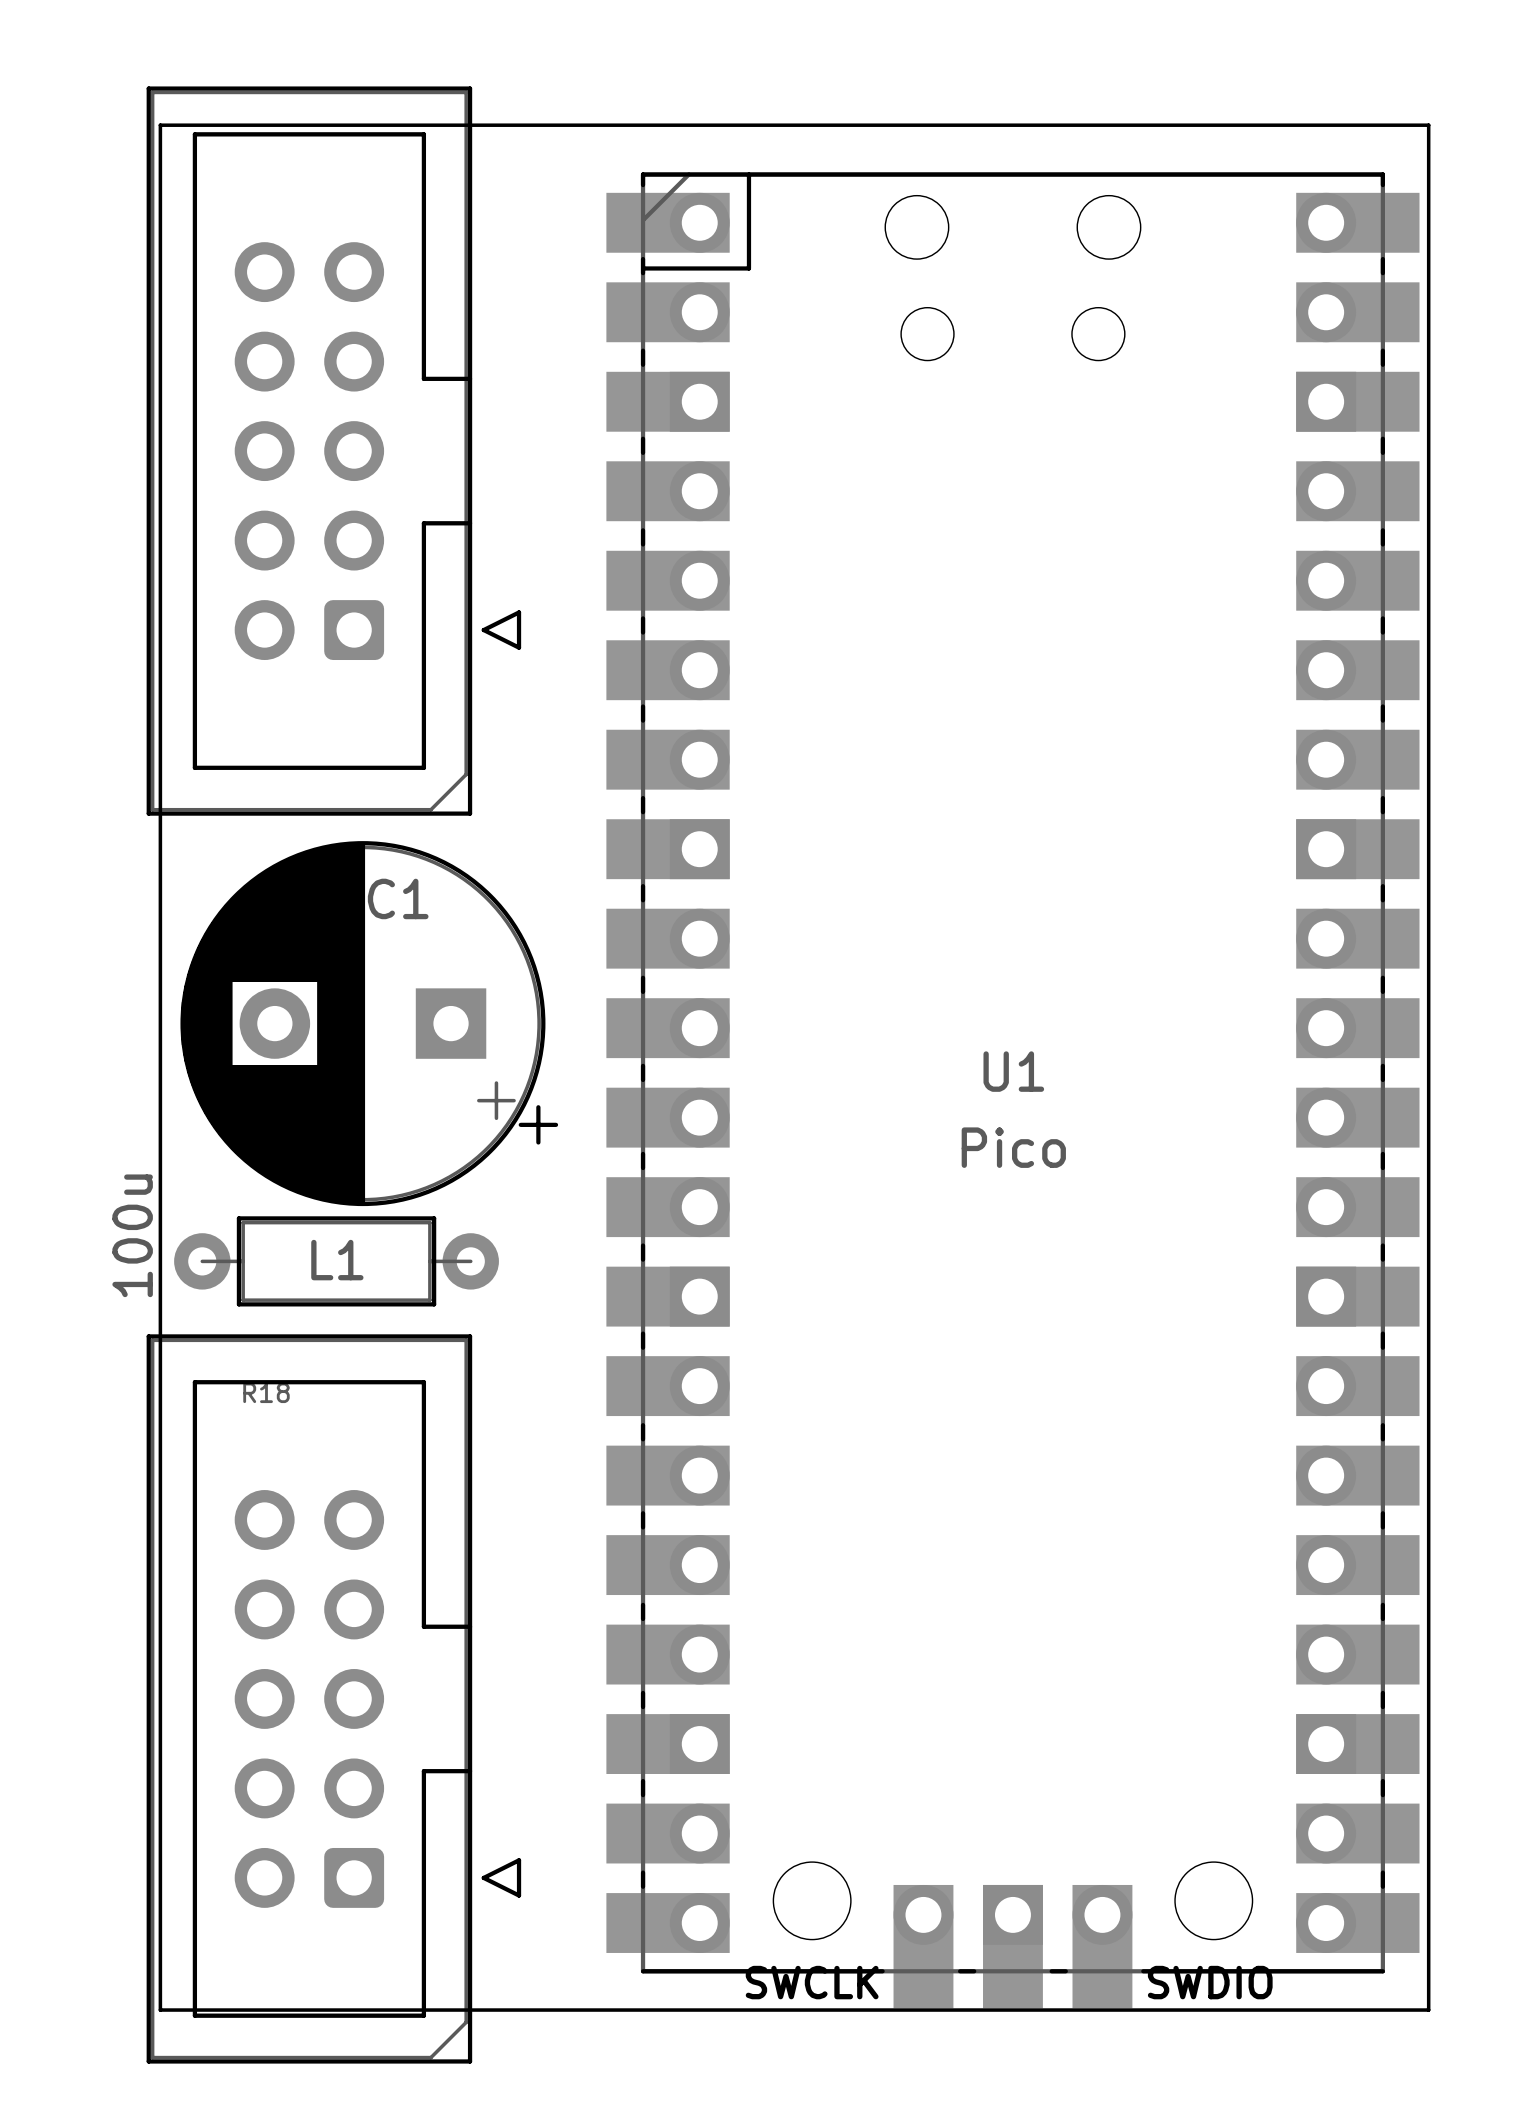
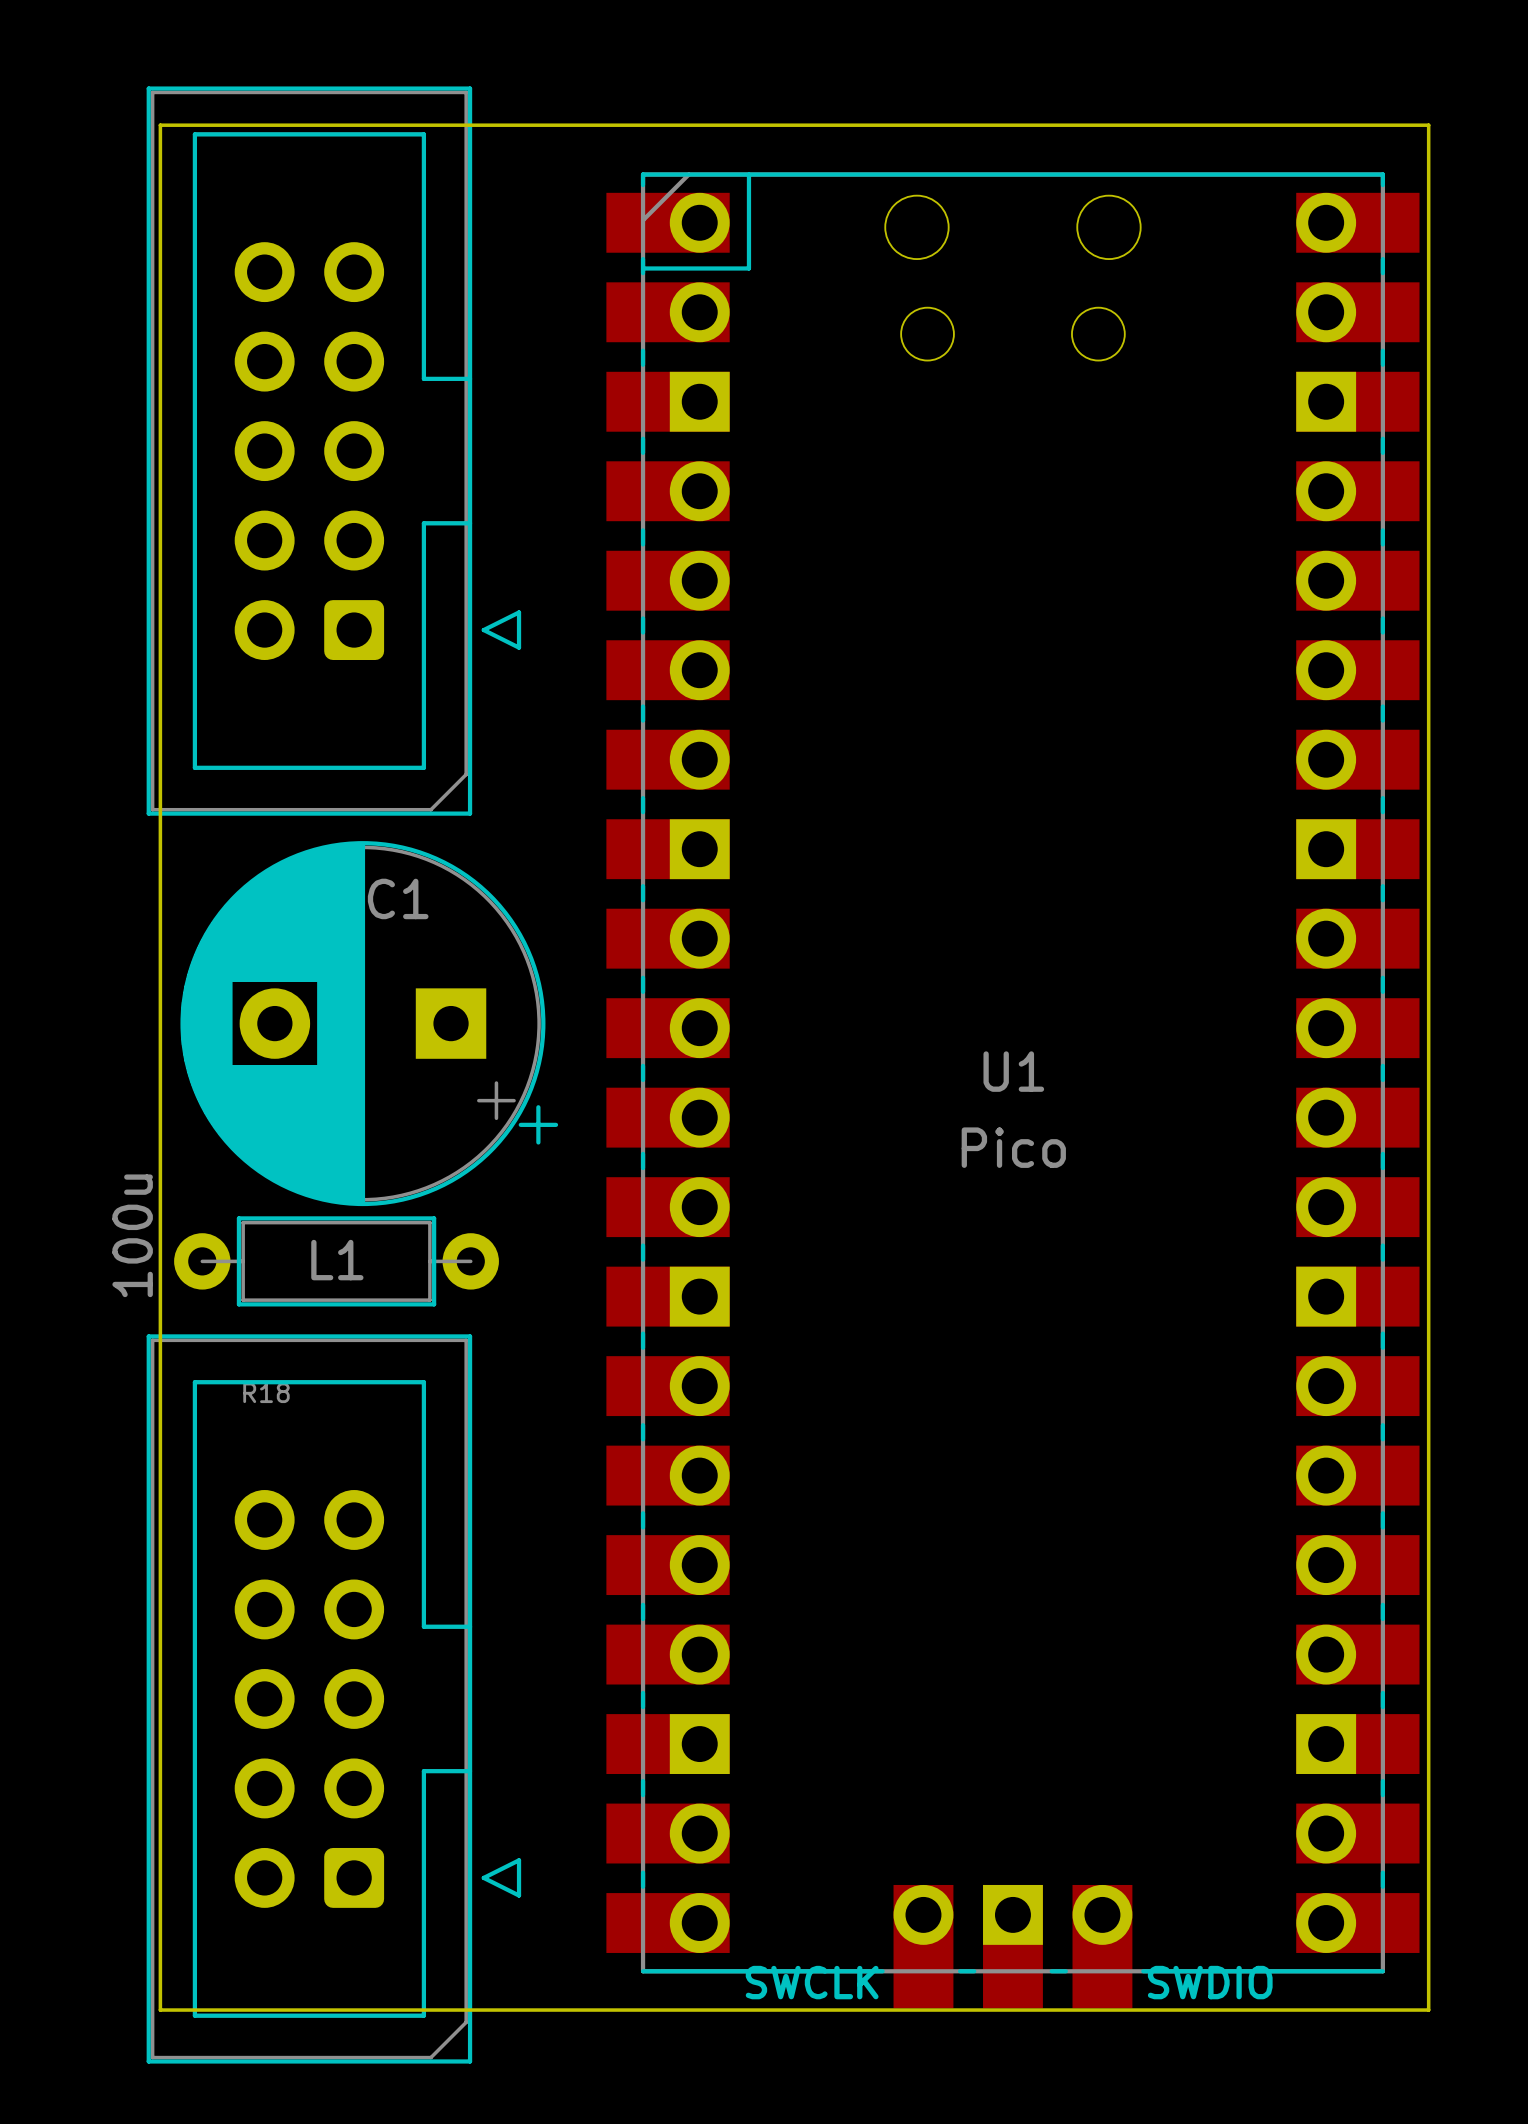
U1 footprint: [606, 172, 1420, 2009] -> [606, 172, 1420, 2009]

